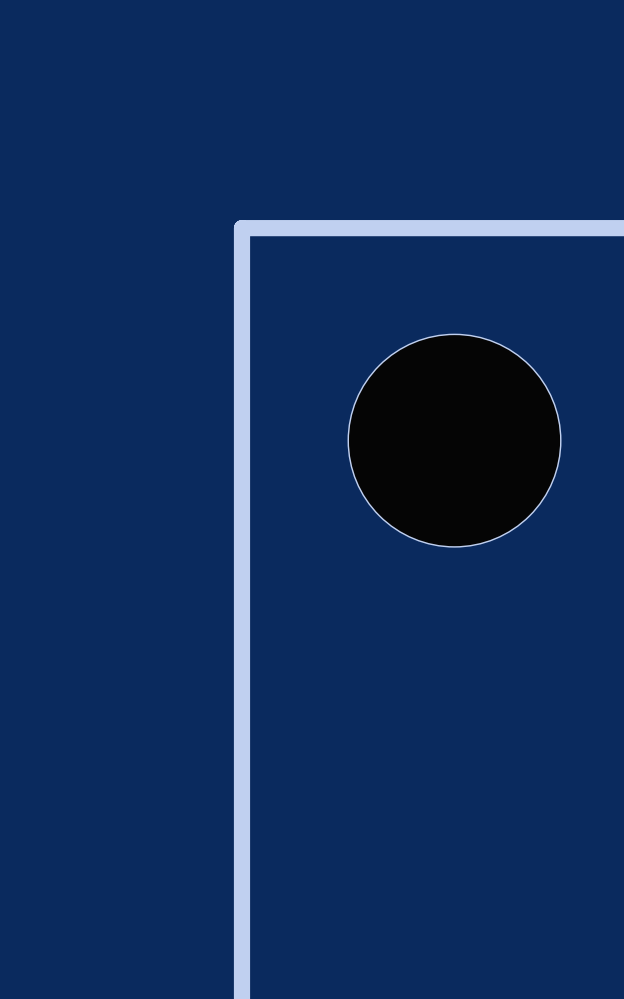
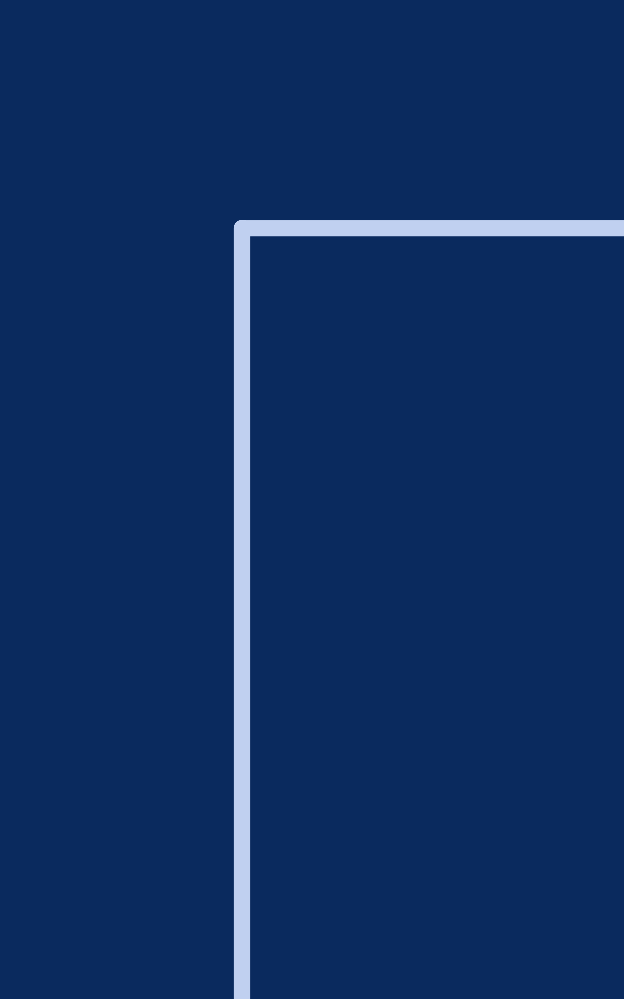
hole: (454, 440) -> none

